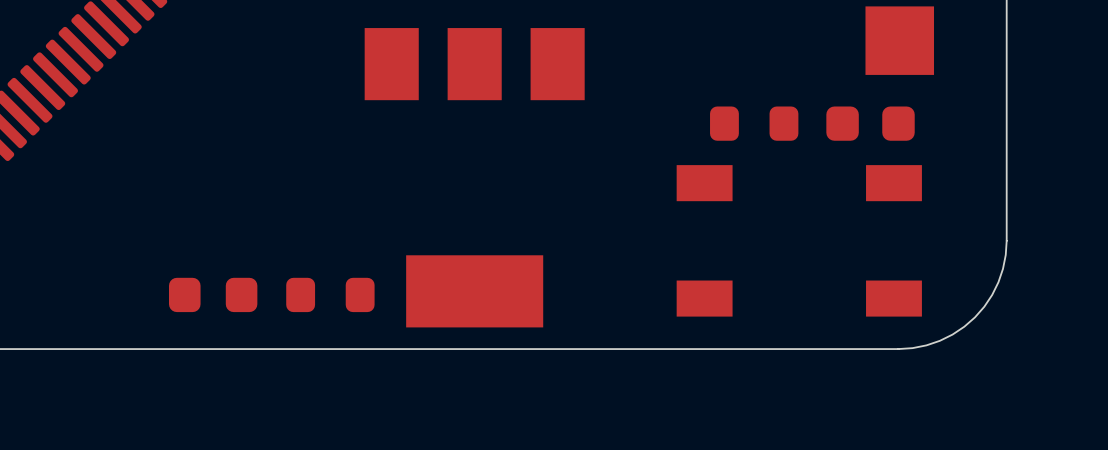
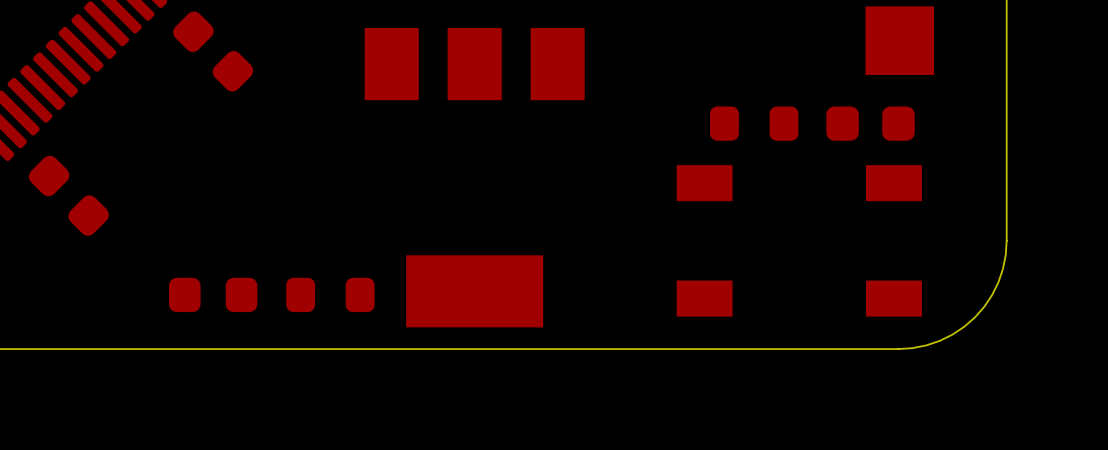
part: none -> (213, 51)
part: none -> (68, 195)

